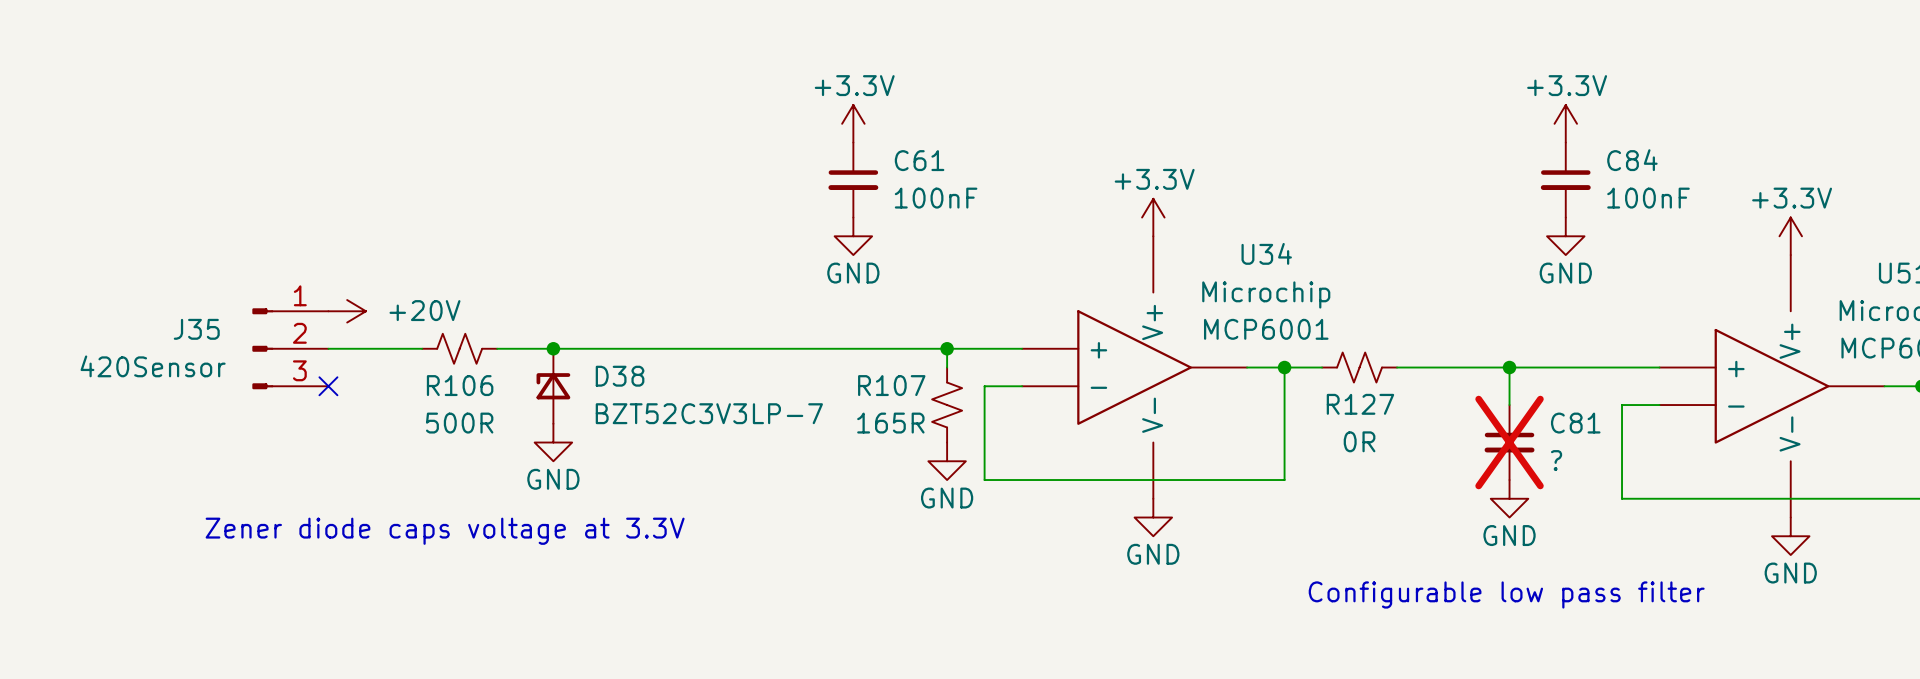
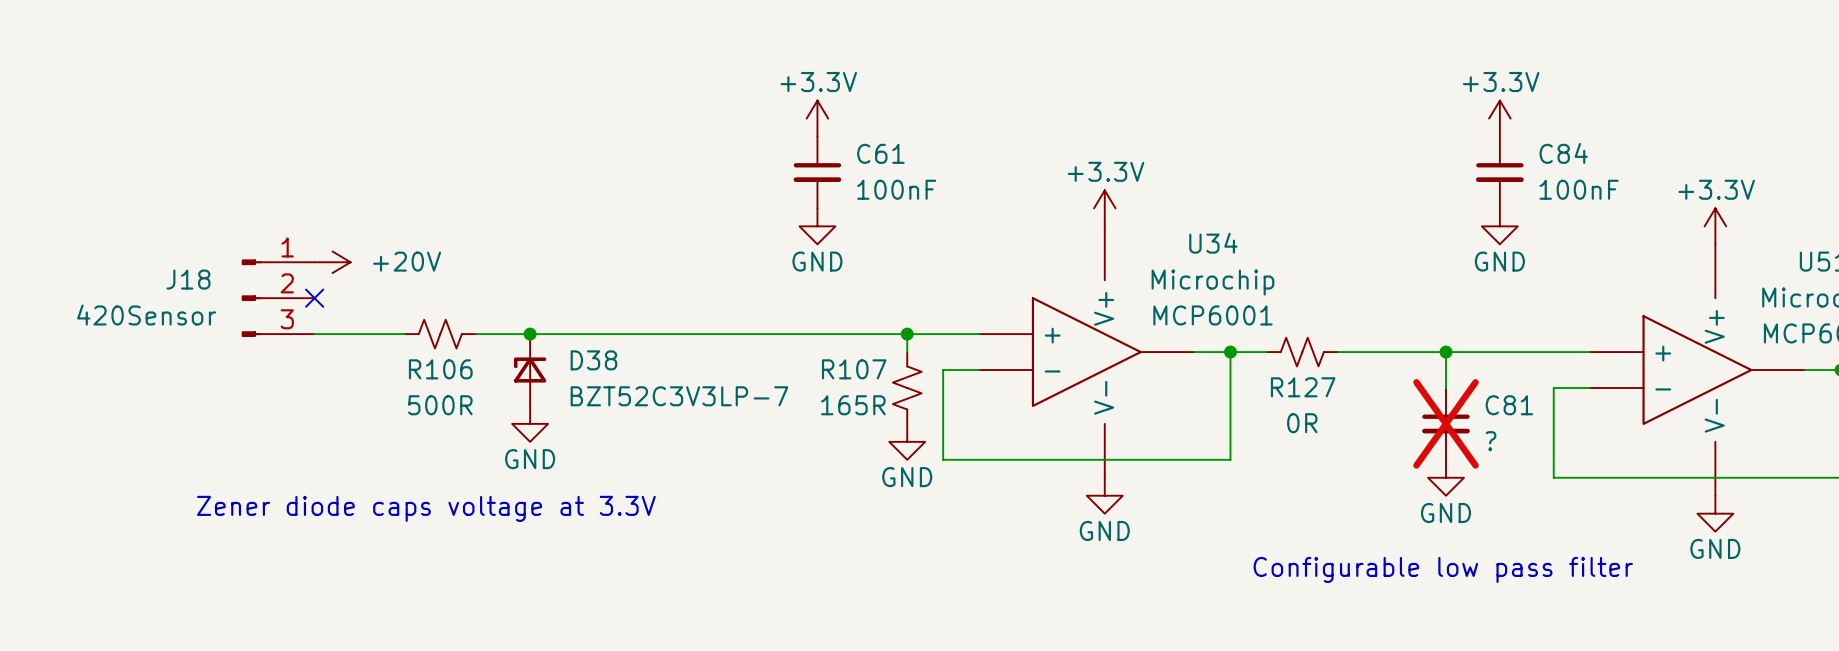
J18: none -> 420Sensor (278, 298)
power symbol position: +20V (347, 311) -> +20V (332, 262)
J35: 420Sensor (290, 348) -> none
no-connect mark position: (328, 386) -> (314, 298)

